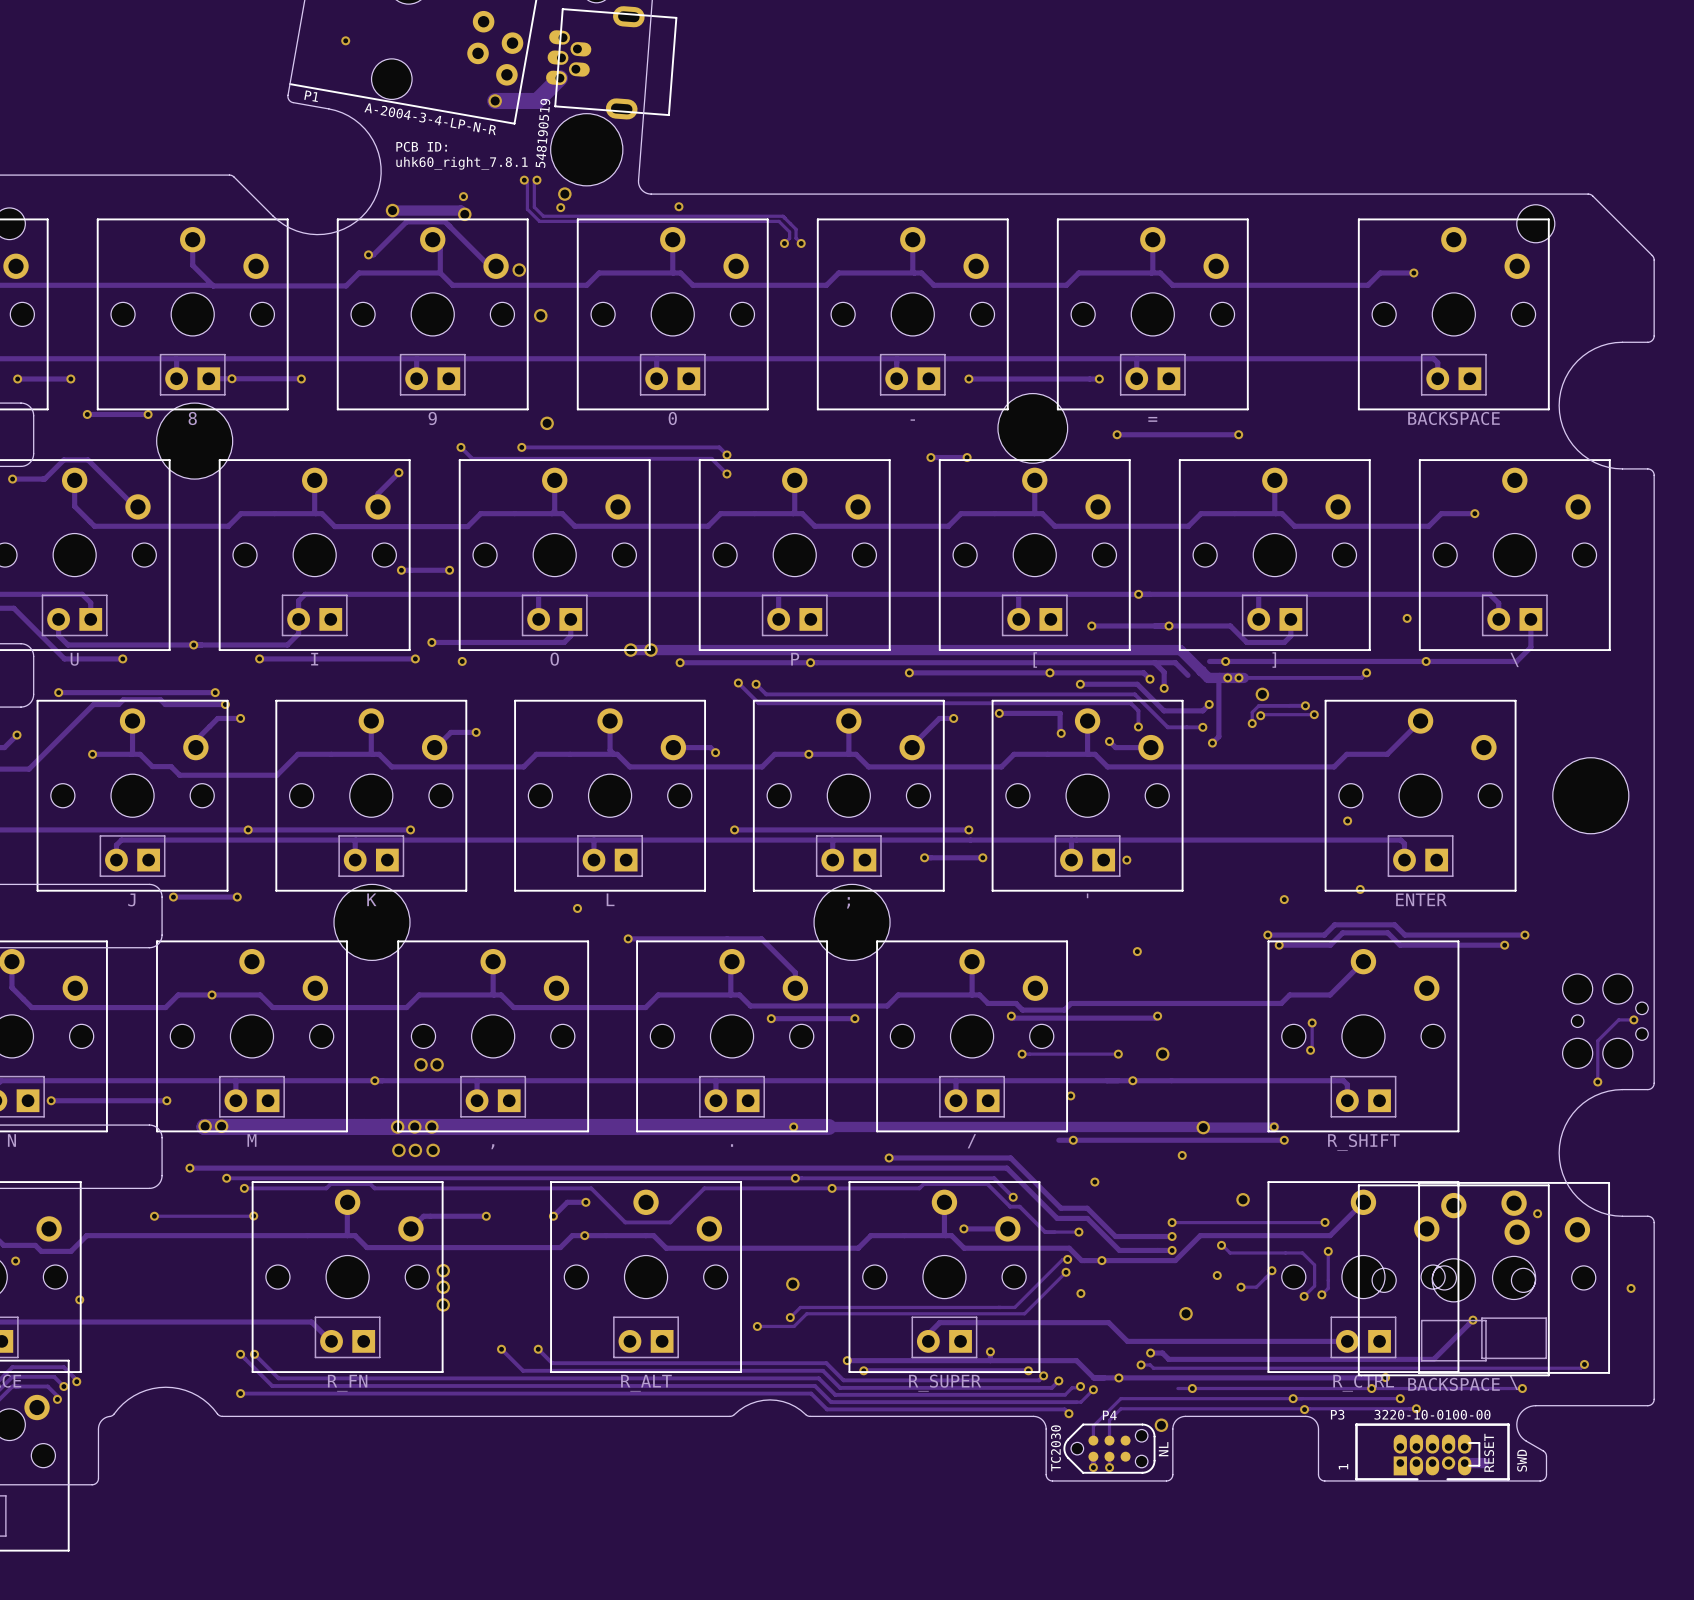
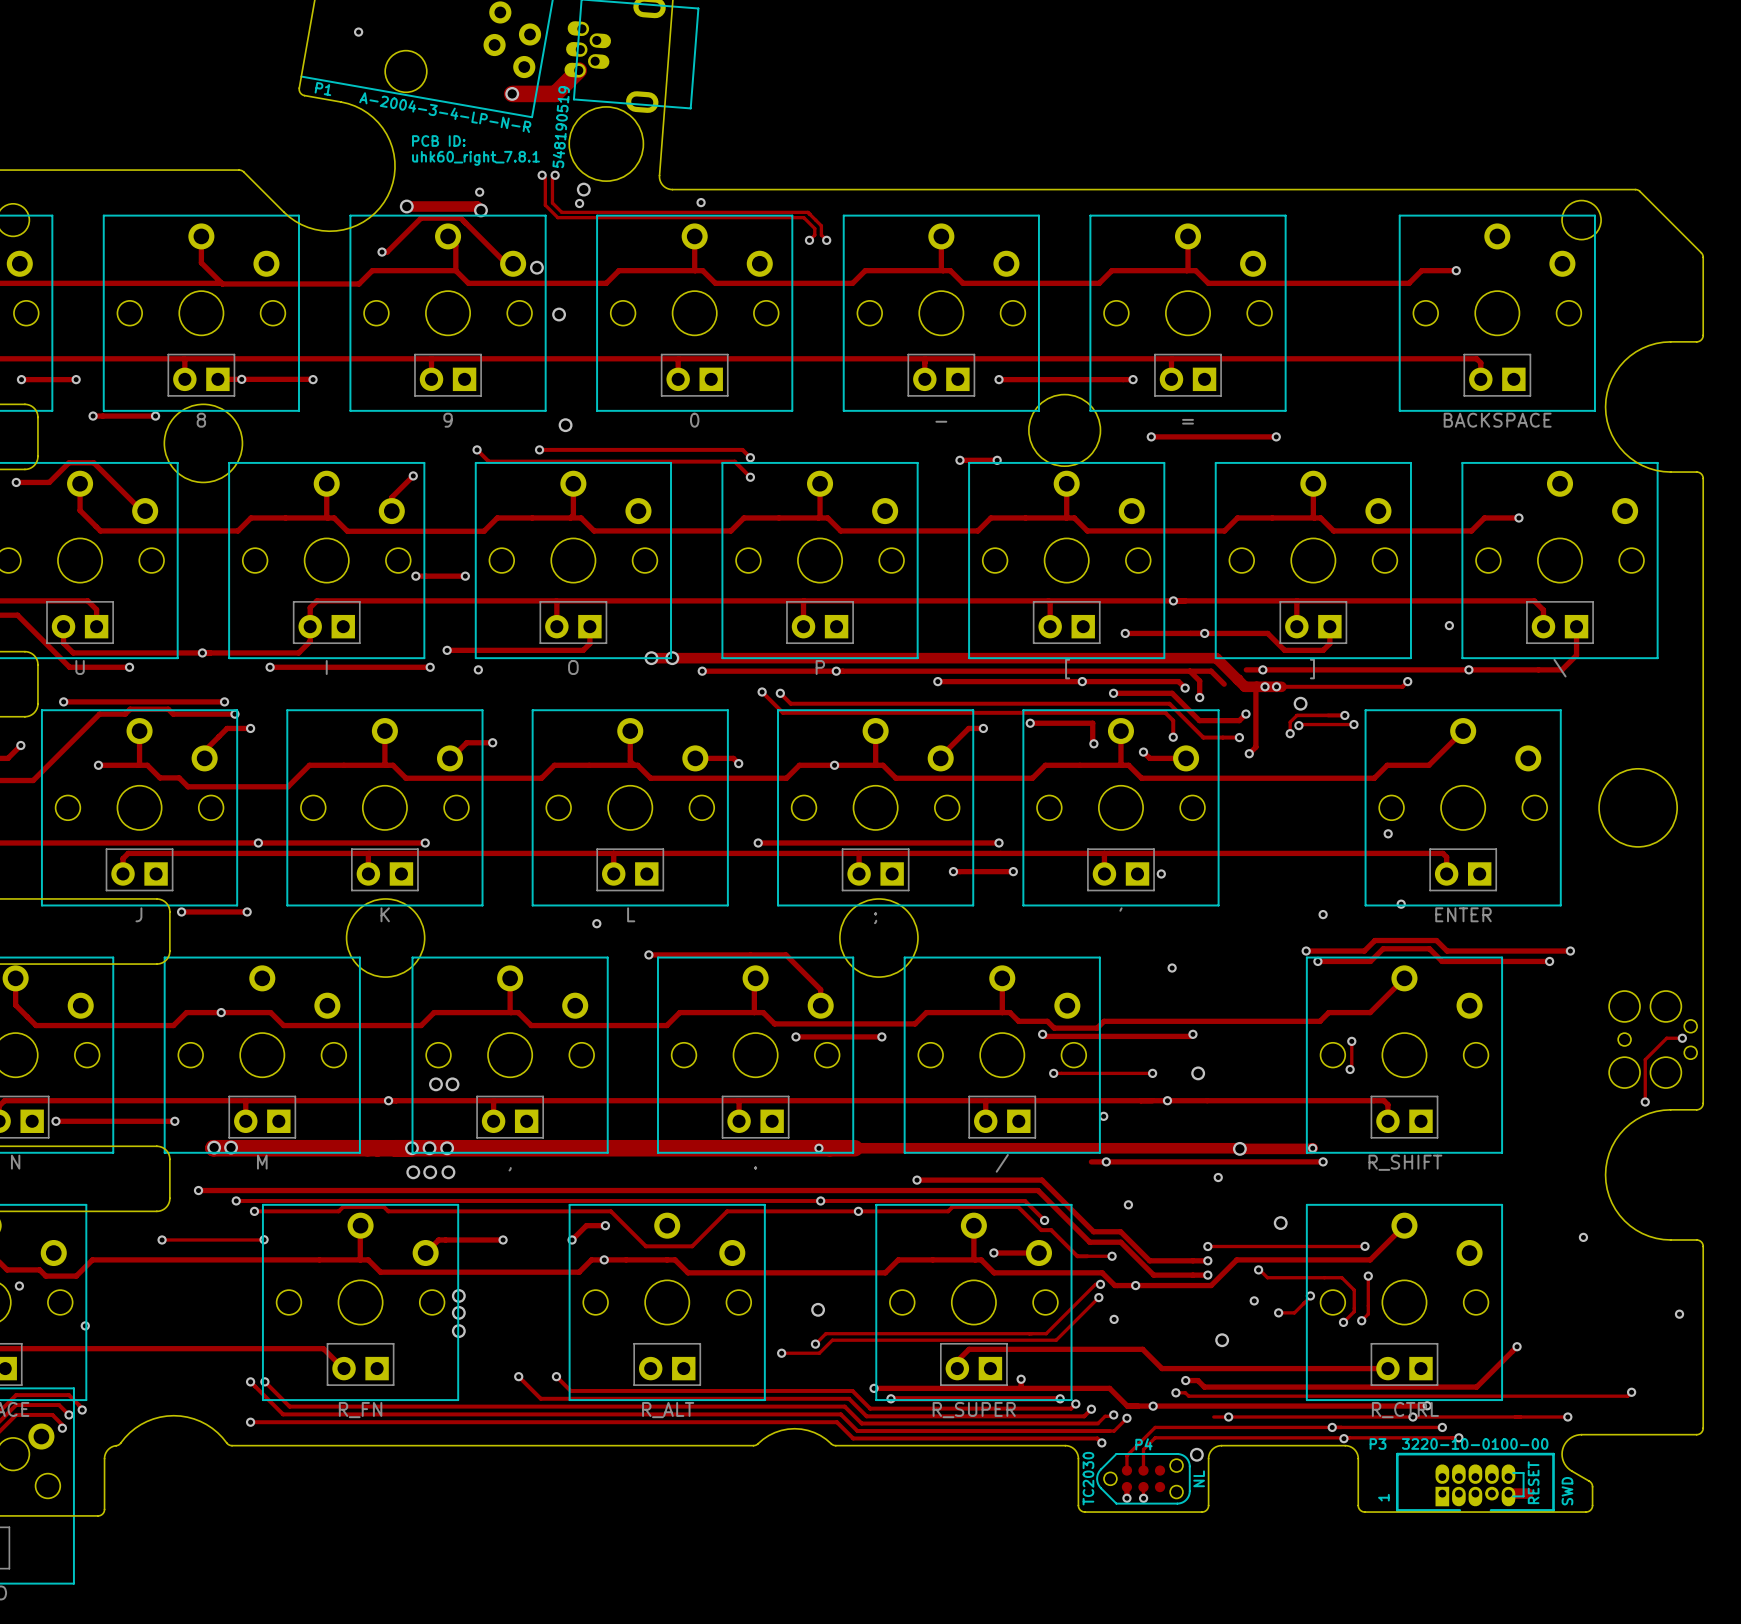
part: \ (1514, 1277) -> none
part: BACKSPACE (1453, 1280) -> none

